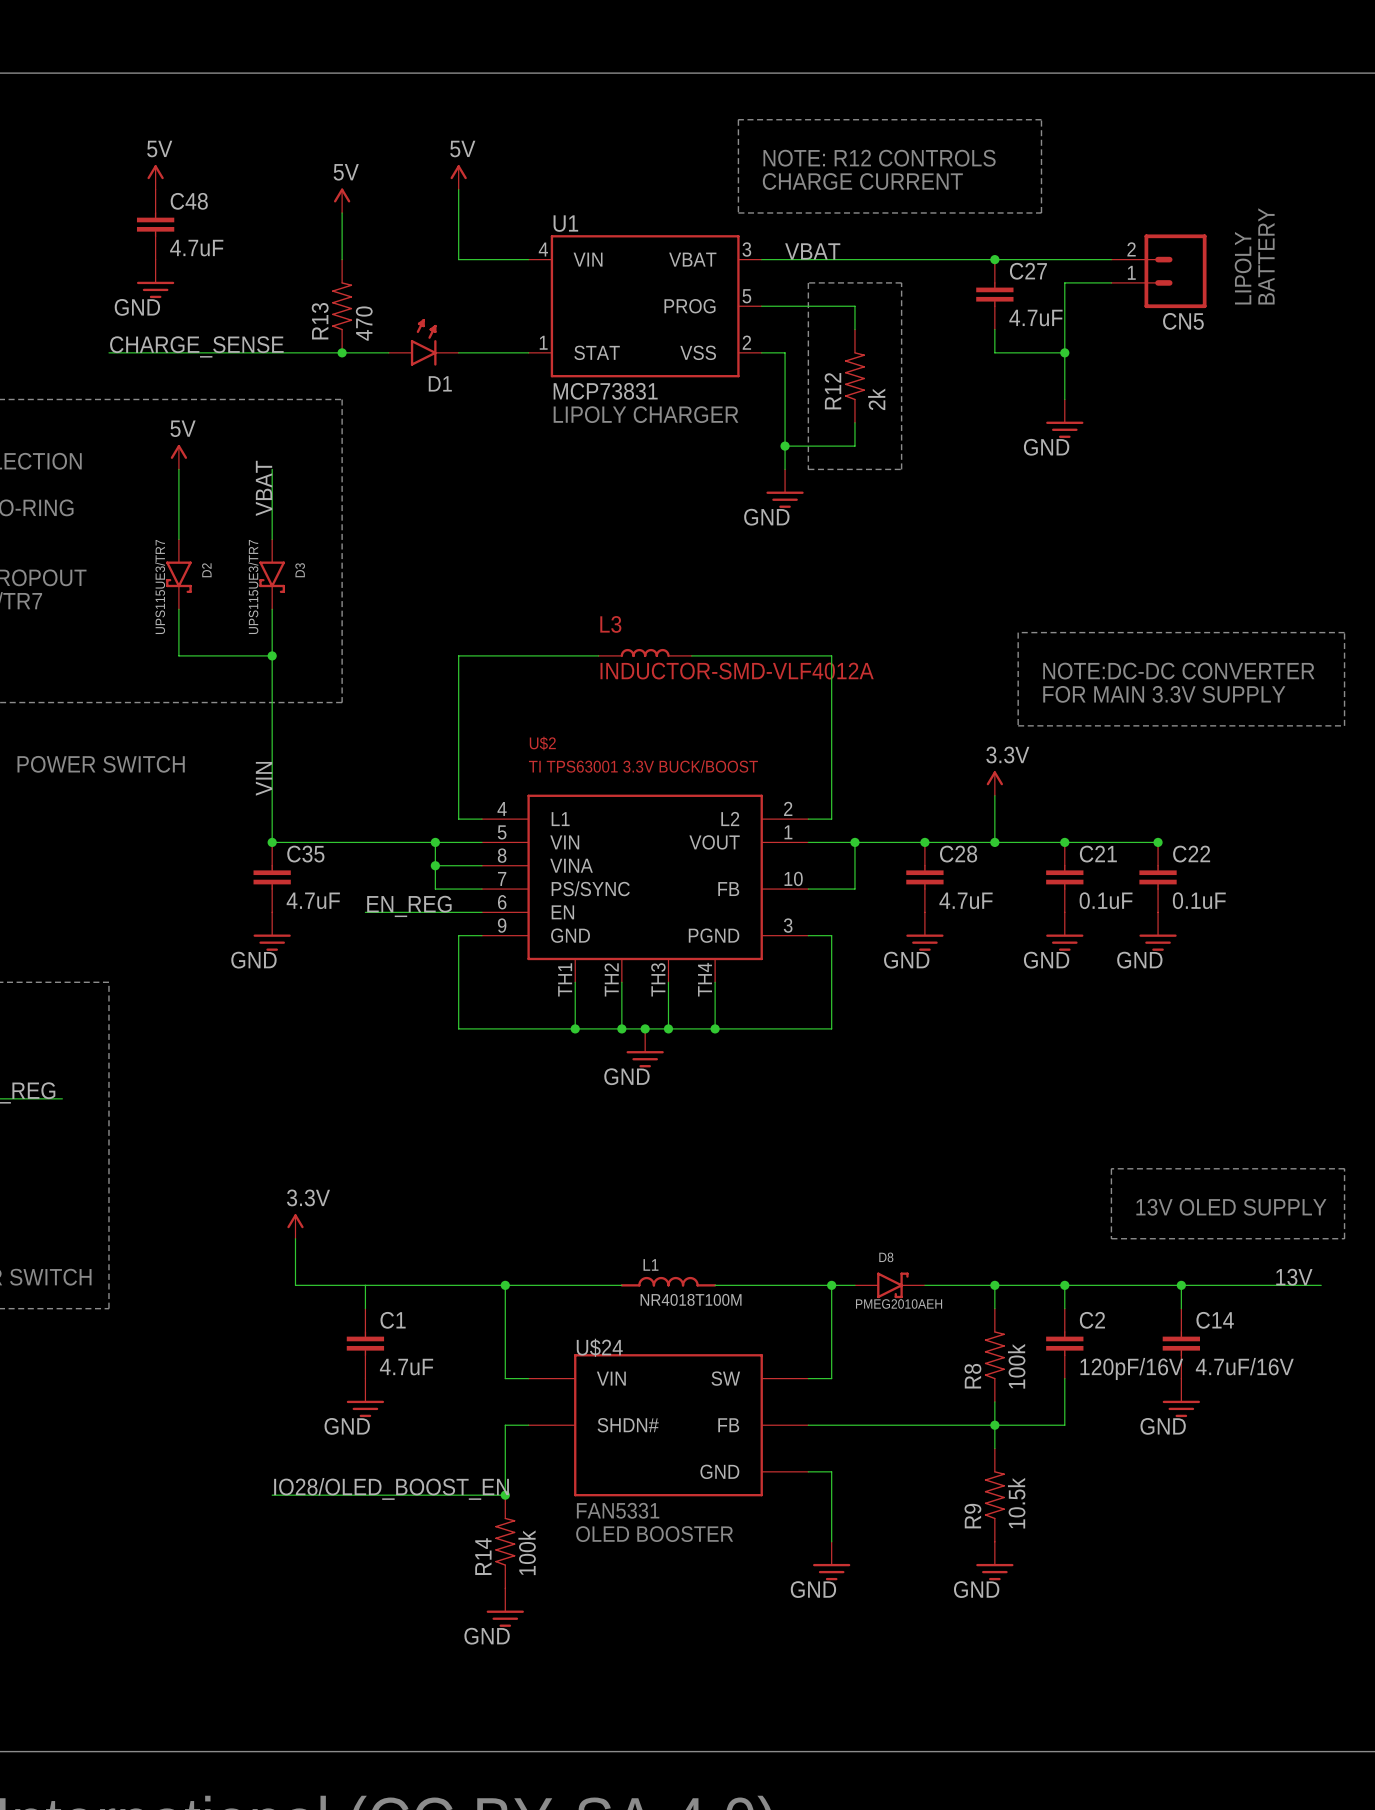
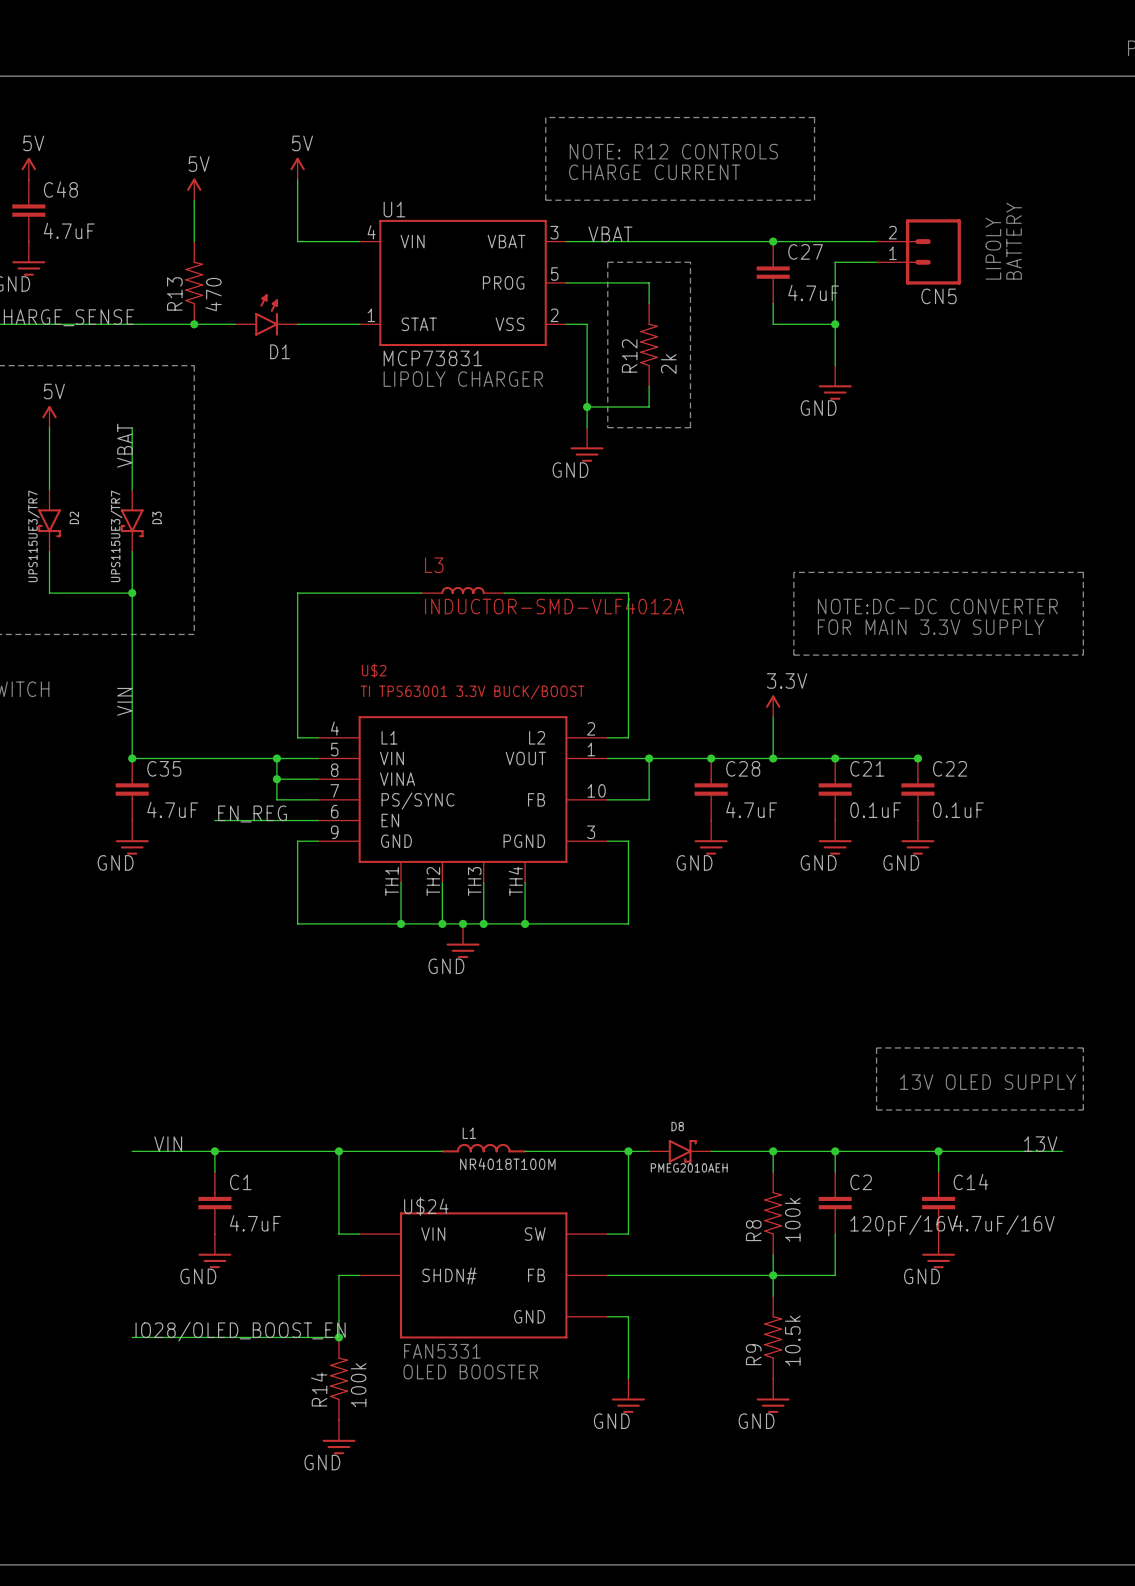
power symbol: 3.3V (295, 1226) -> none
wire: (295, 1238) (295, 1285) -> (132, 1151) (152, 1151)
label: none -> VIN (168, 1144)
junction: none -> (214, 1151)

